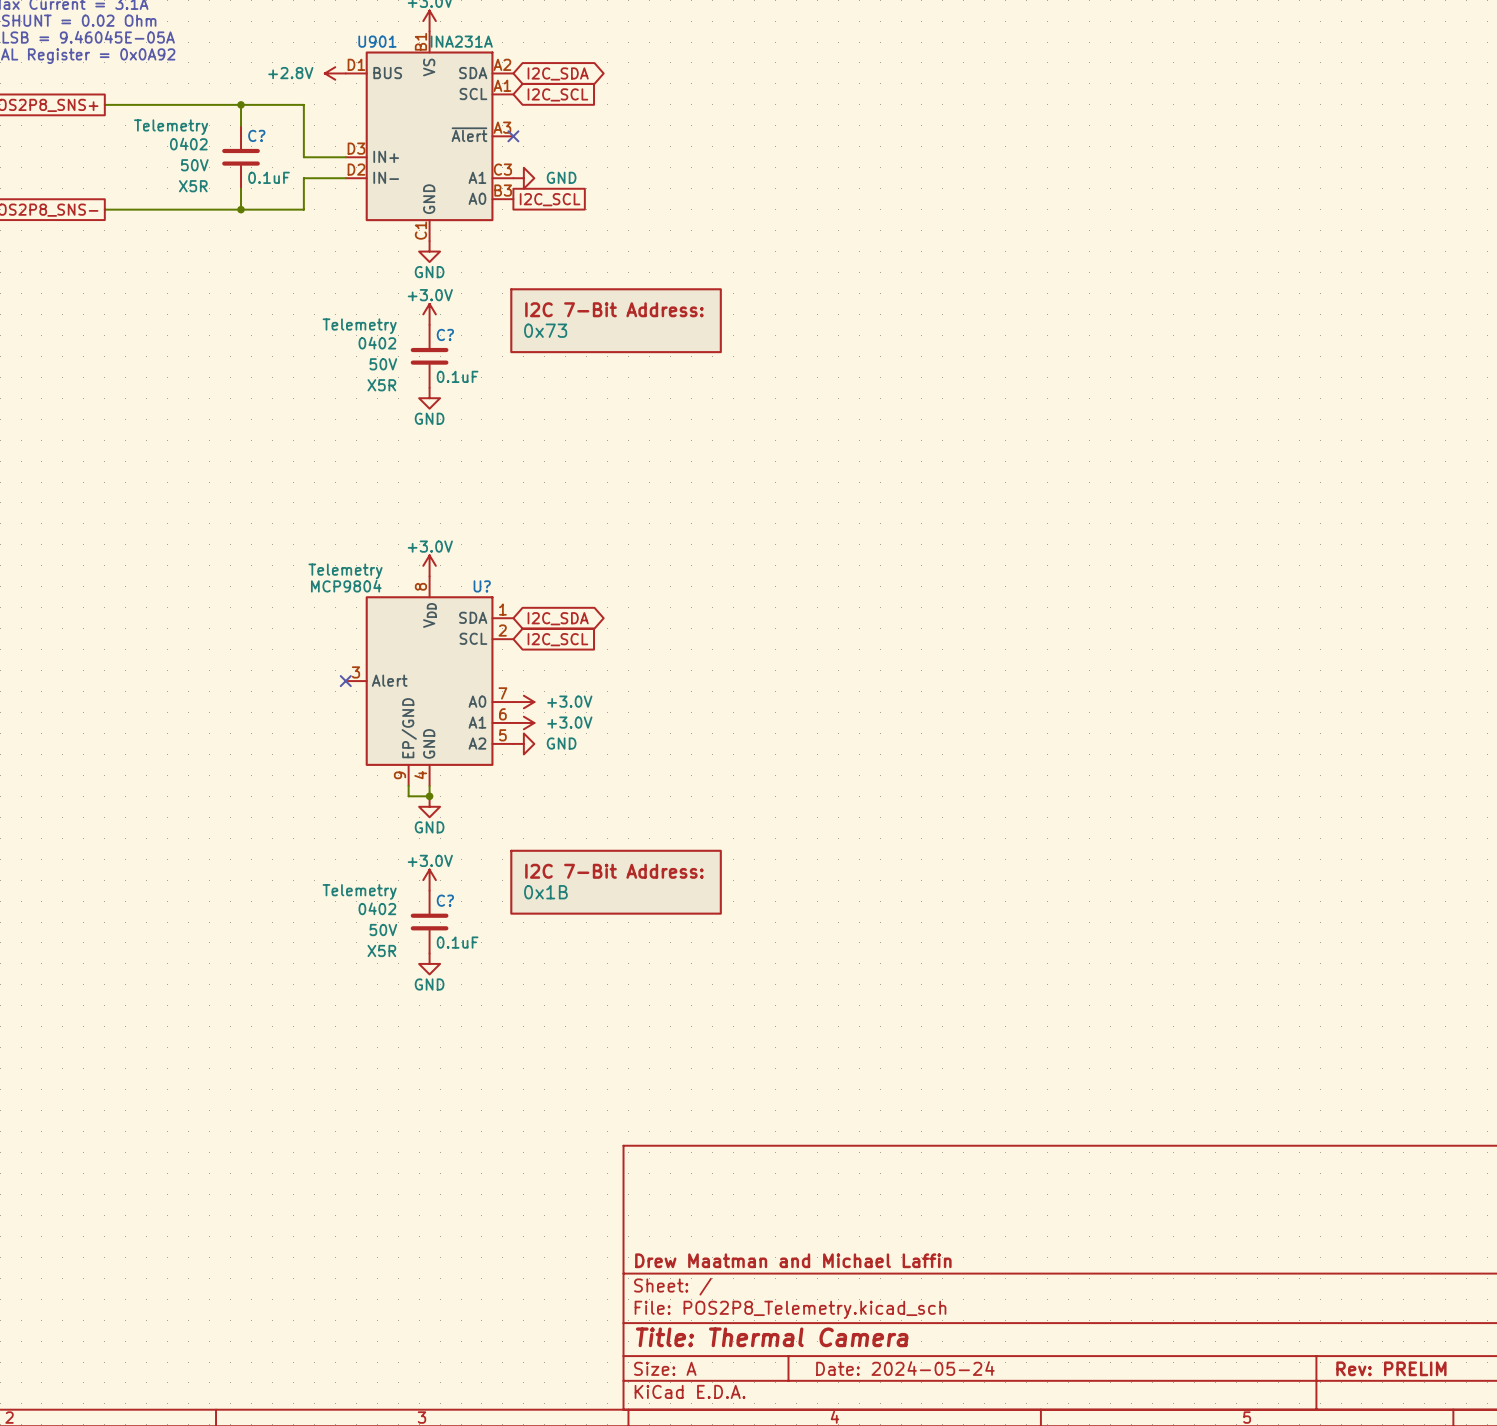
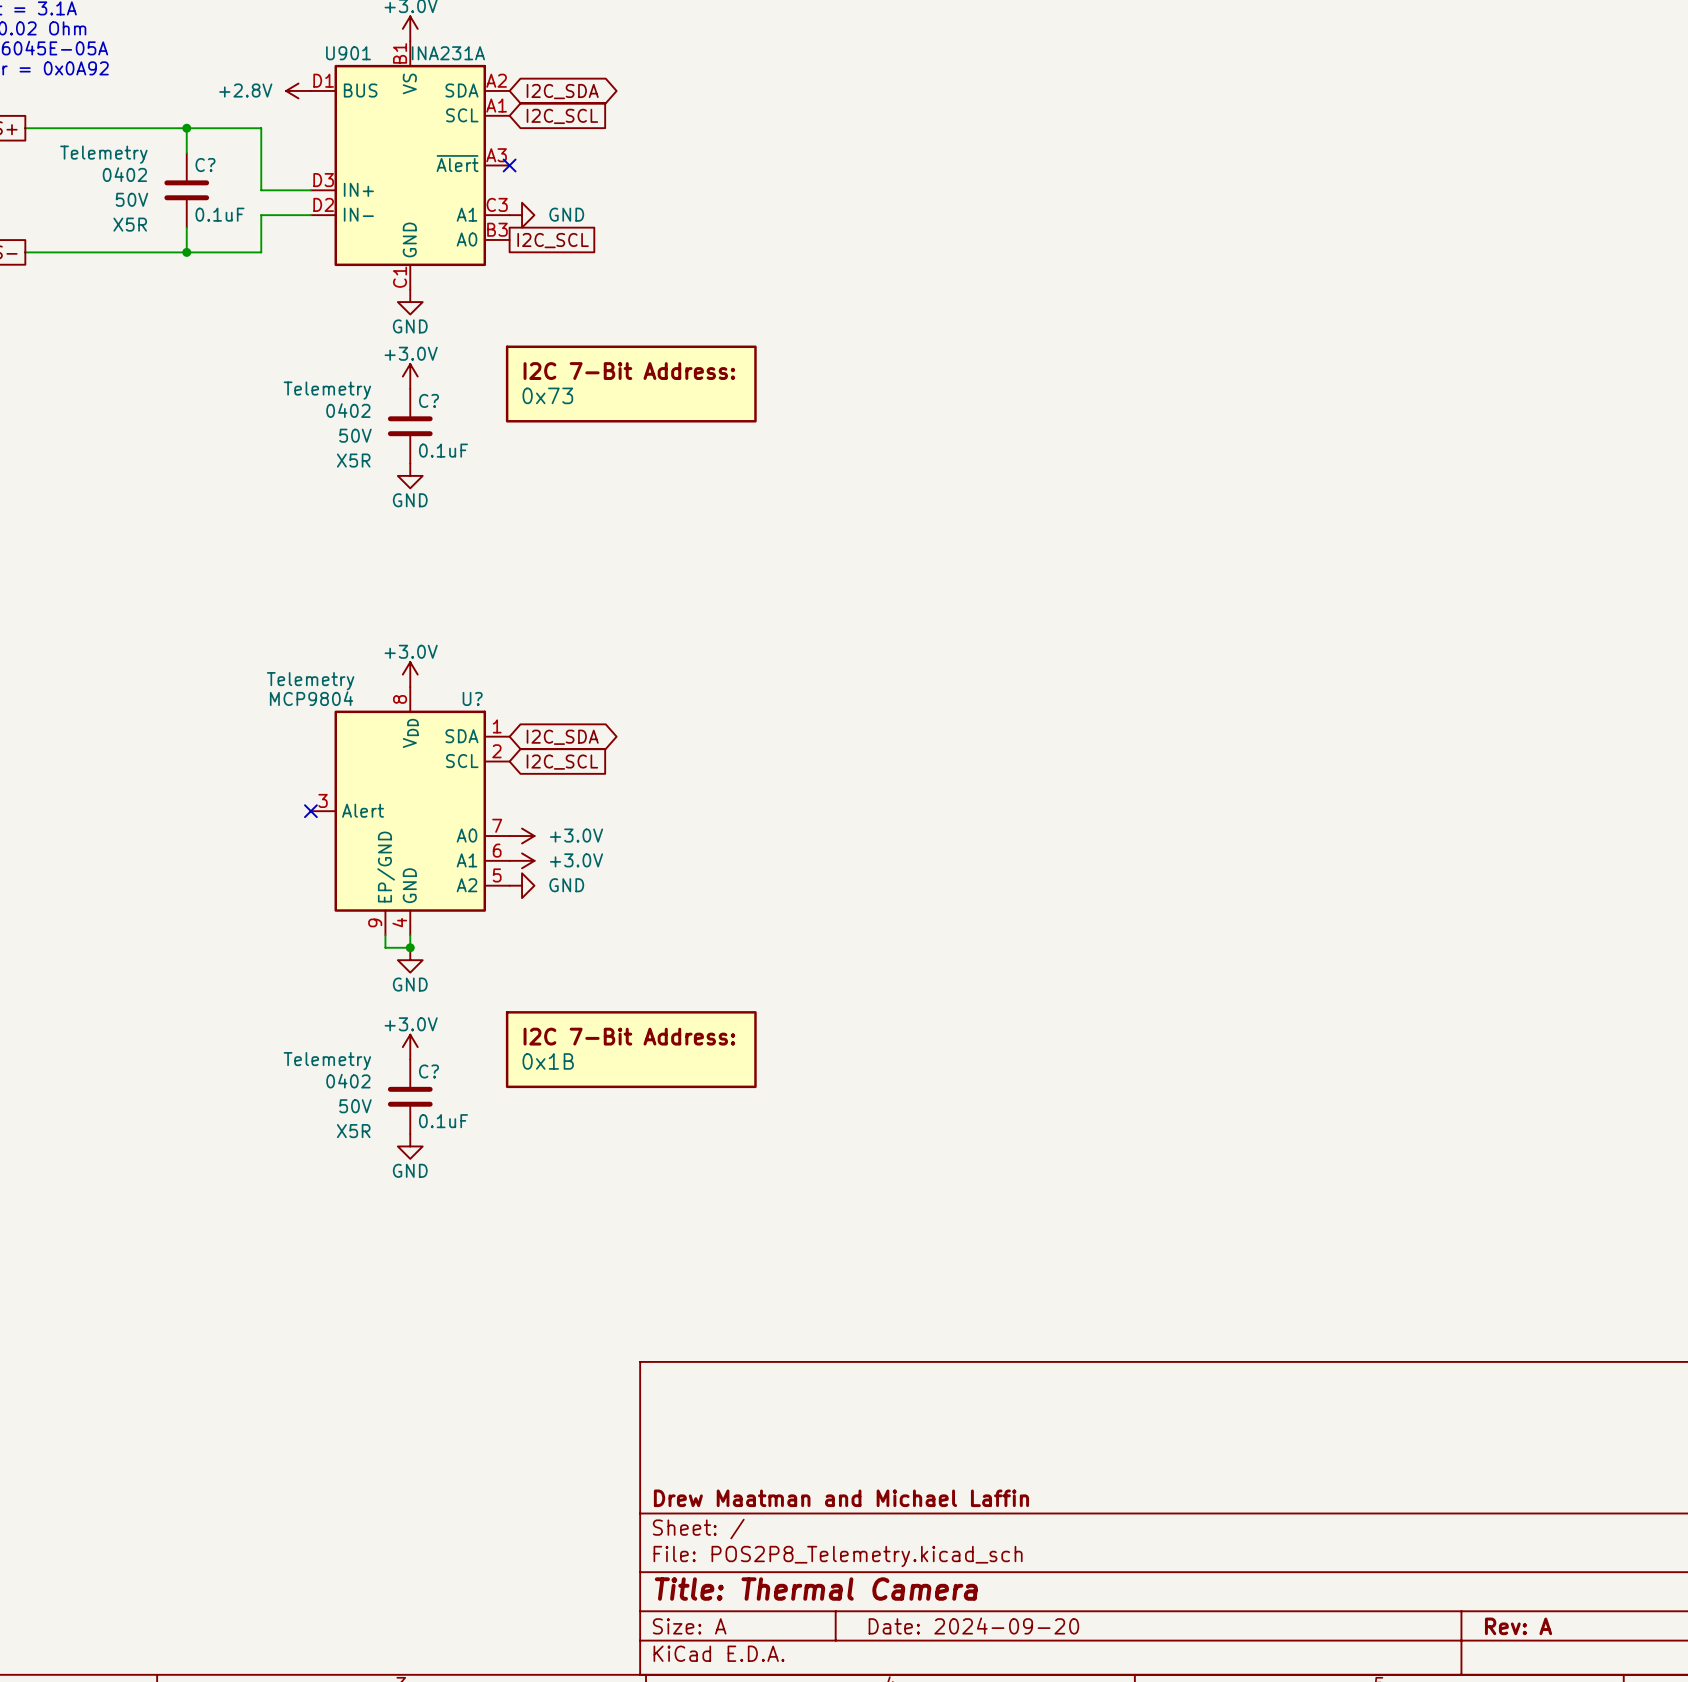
title block: Date: 2024-05-24 (905, 1368) -> Date: 2024-09-20 (973, 1626)
title block: Rev: PRELIM (1391, 1368) -> Rev: A (1518, 1626)

